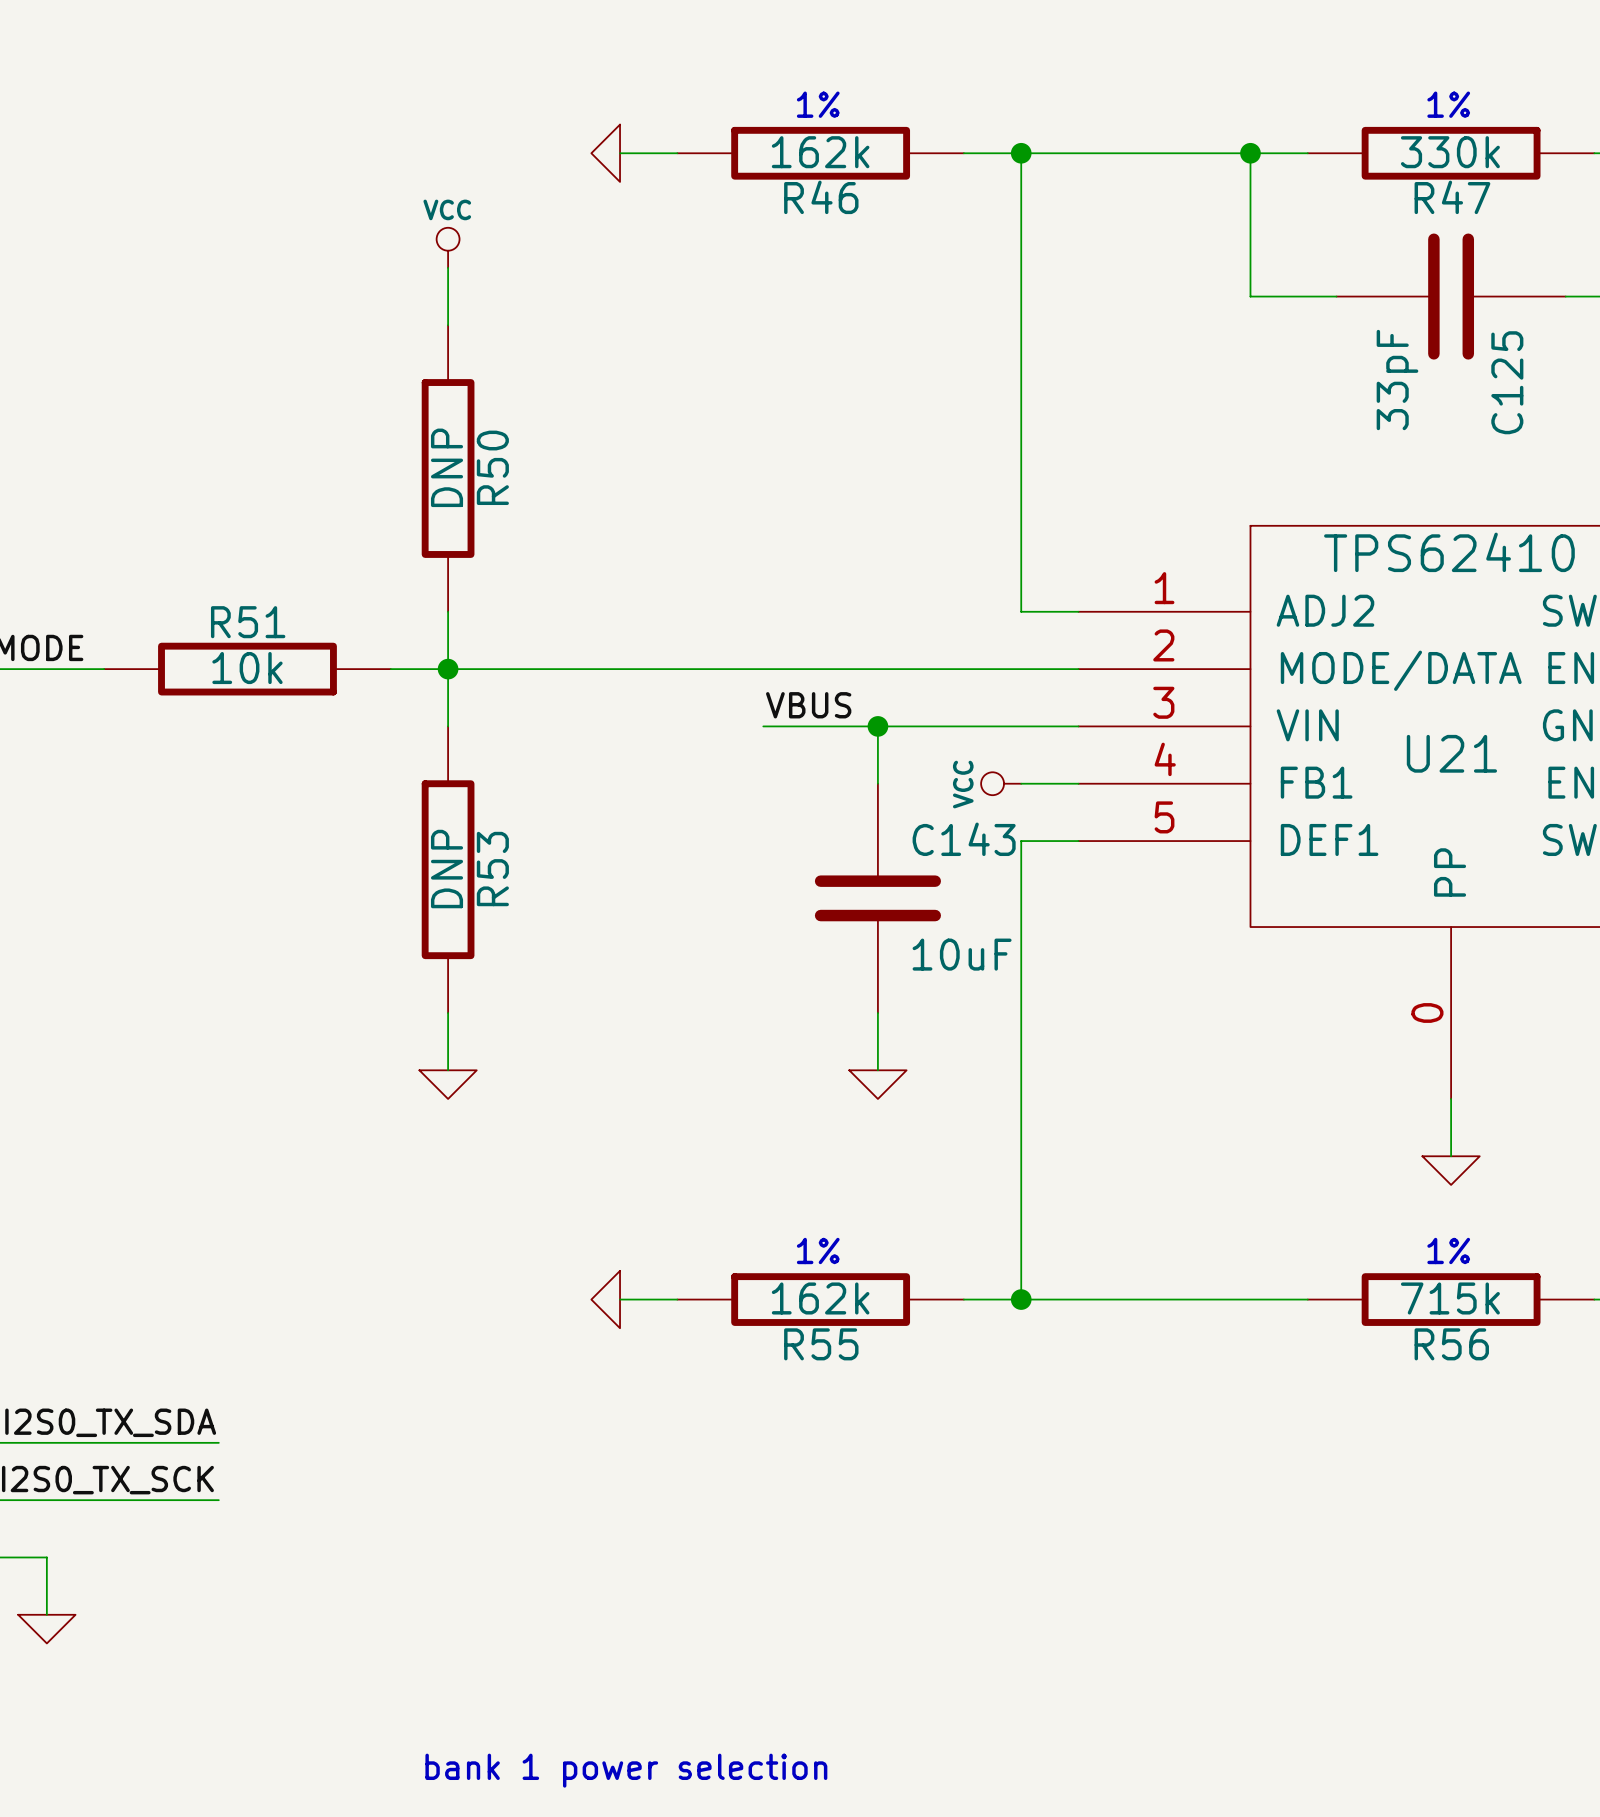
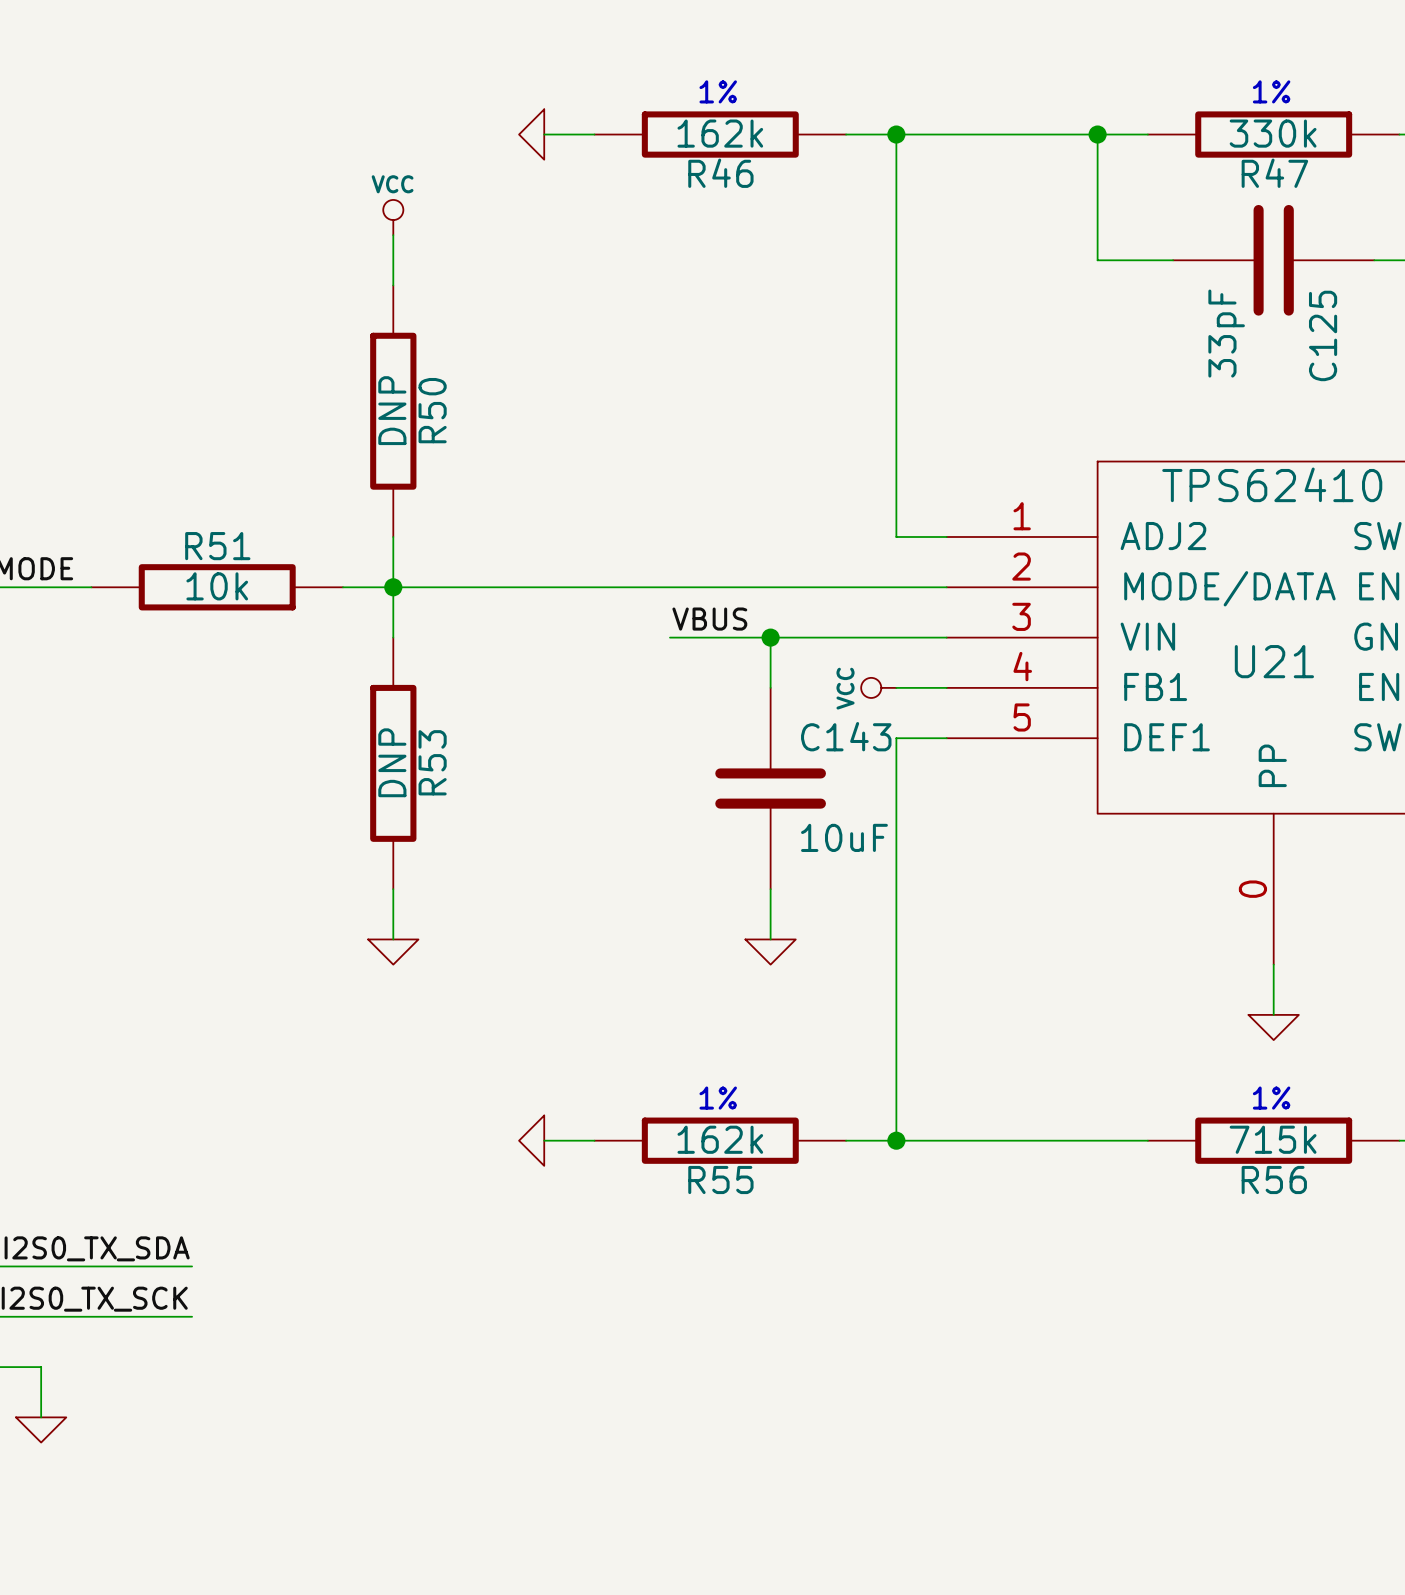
text: bank 1 power selection (626, 1770) -> none

